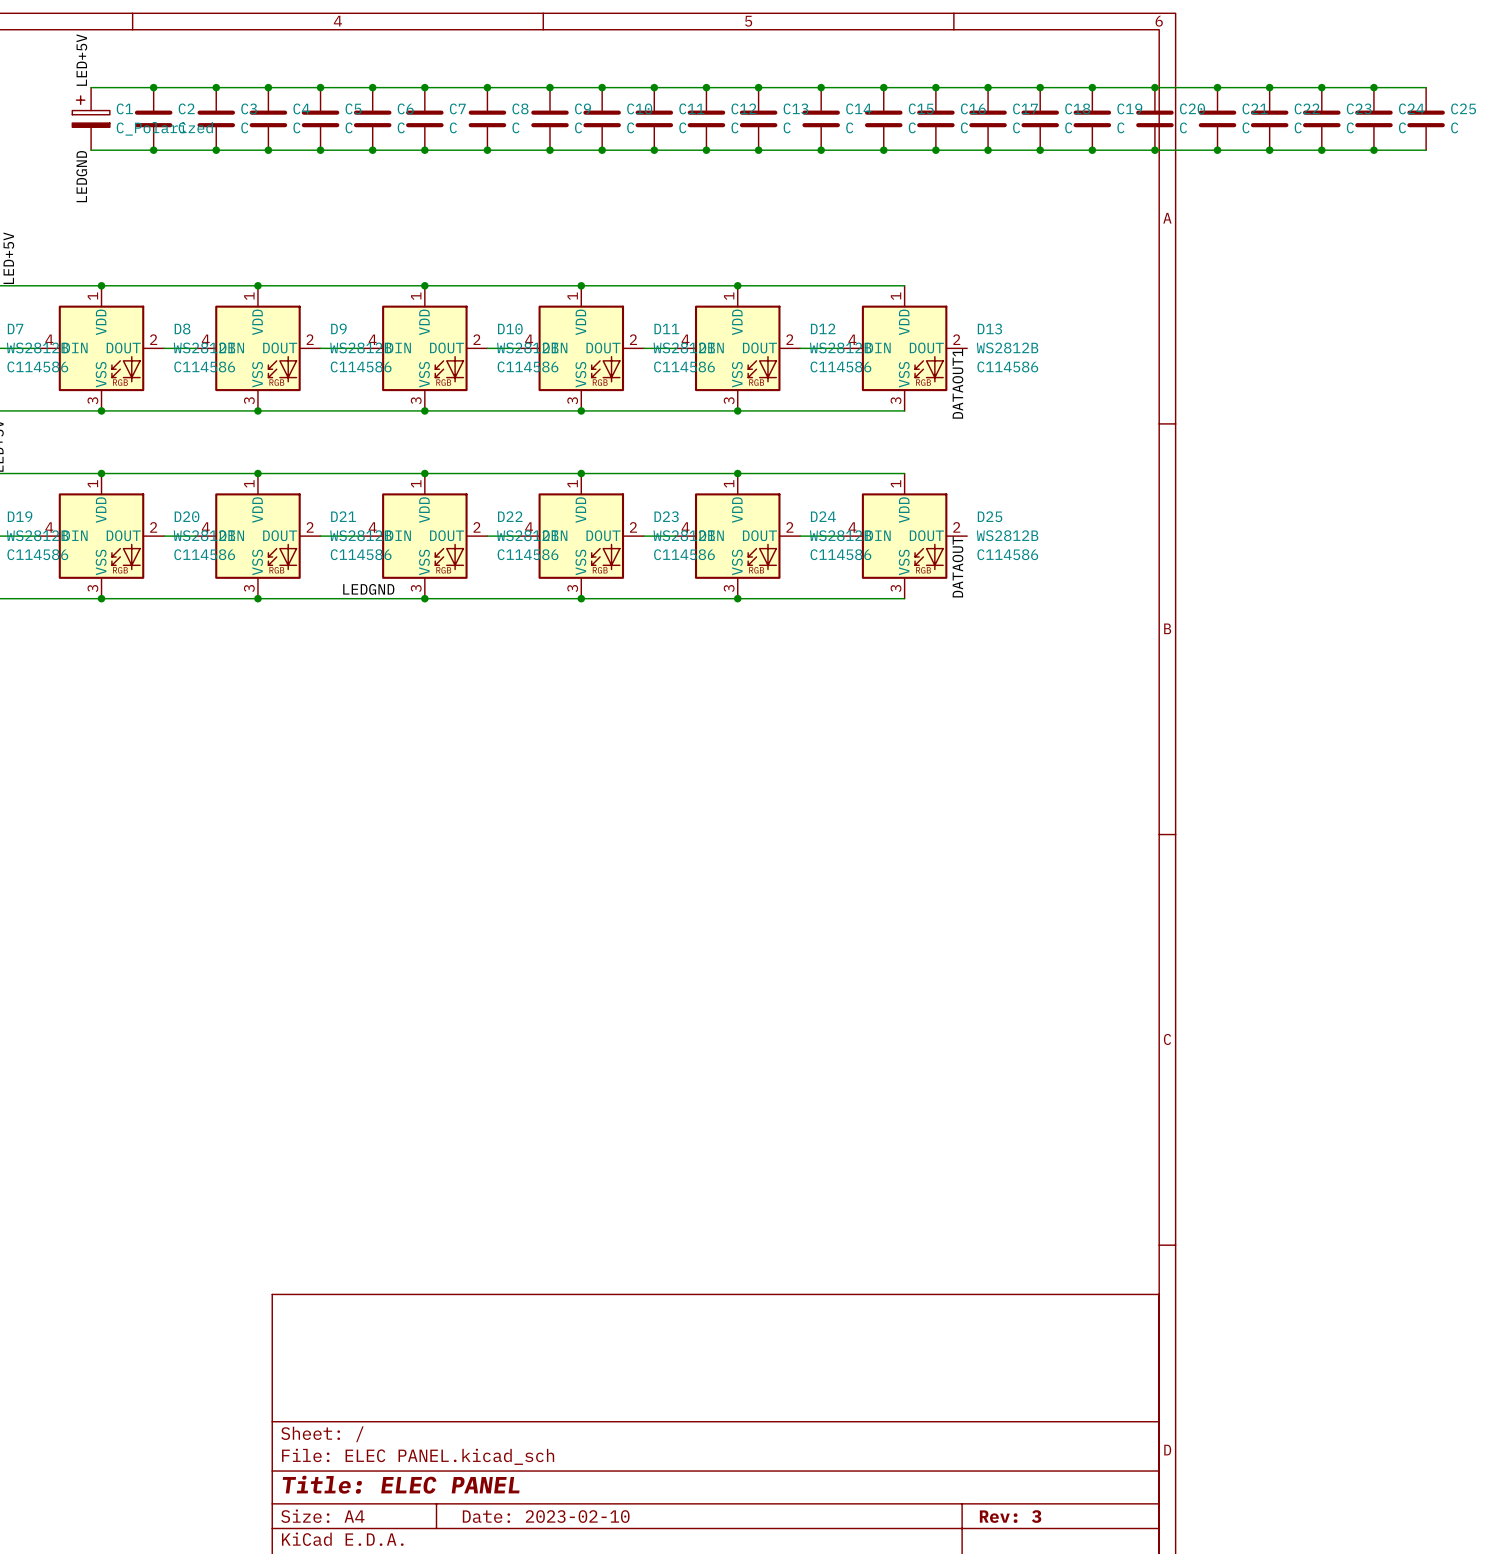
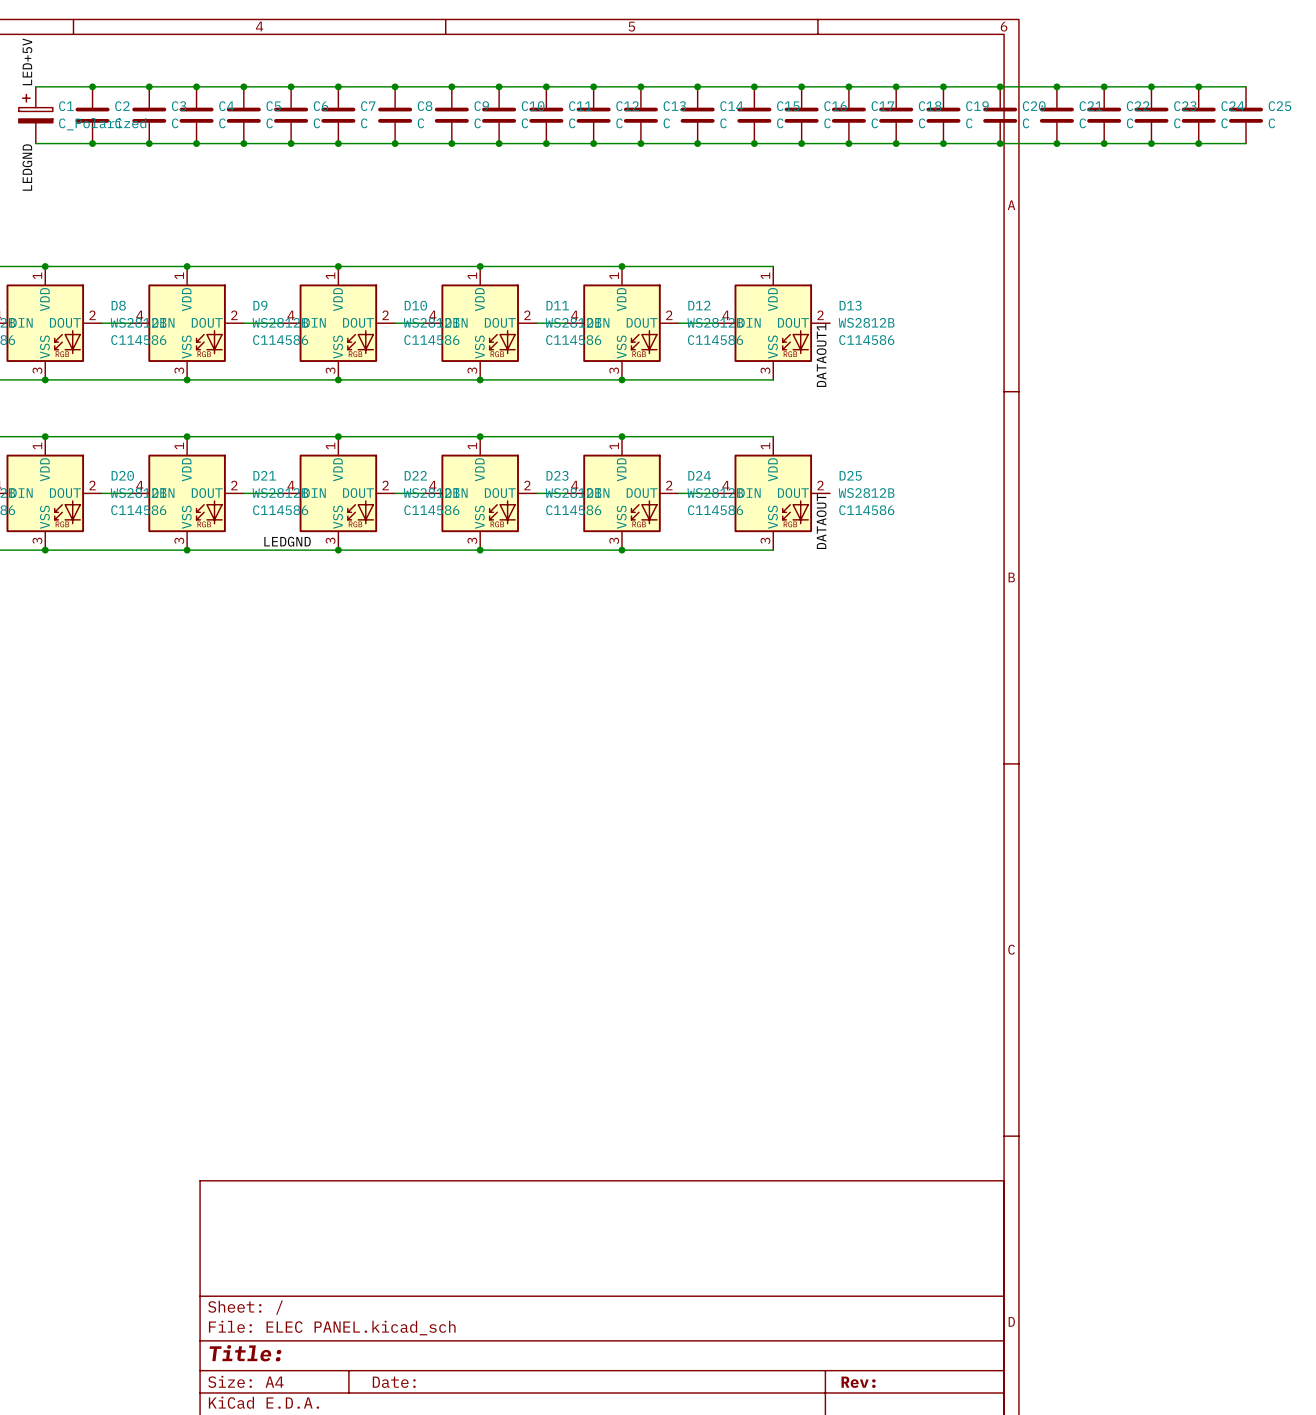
title block: Title: ELEC PANEL (401, 1484) -> Title: (245, 1353)
title block: Date: 2023-02-10 (546, 1516) -> Date: (394, 1382)
title block: Rev: 3 (1010, 1516) -> Rev: (858, 1382)

